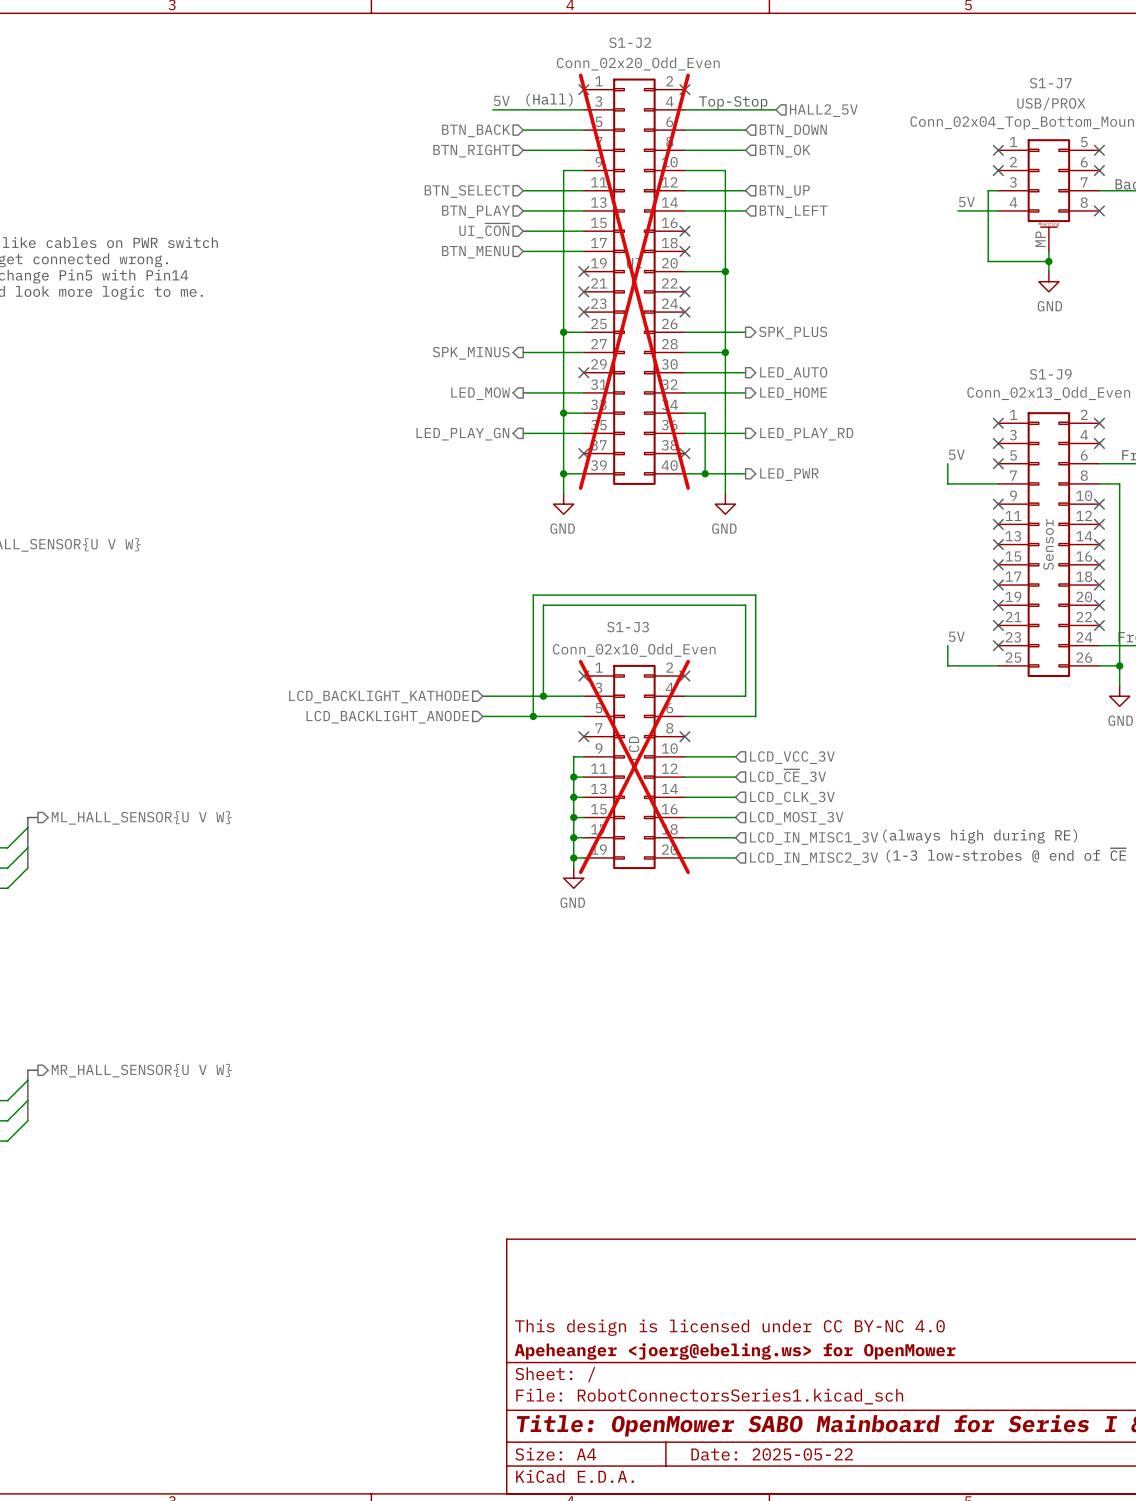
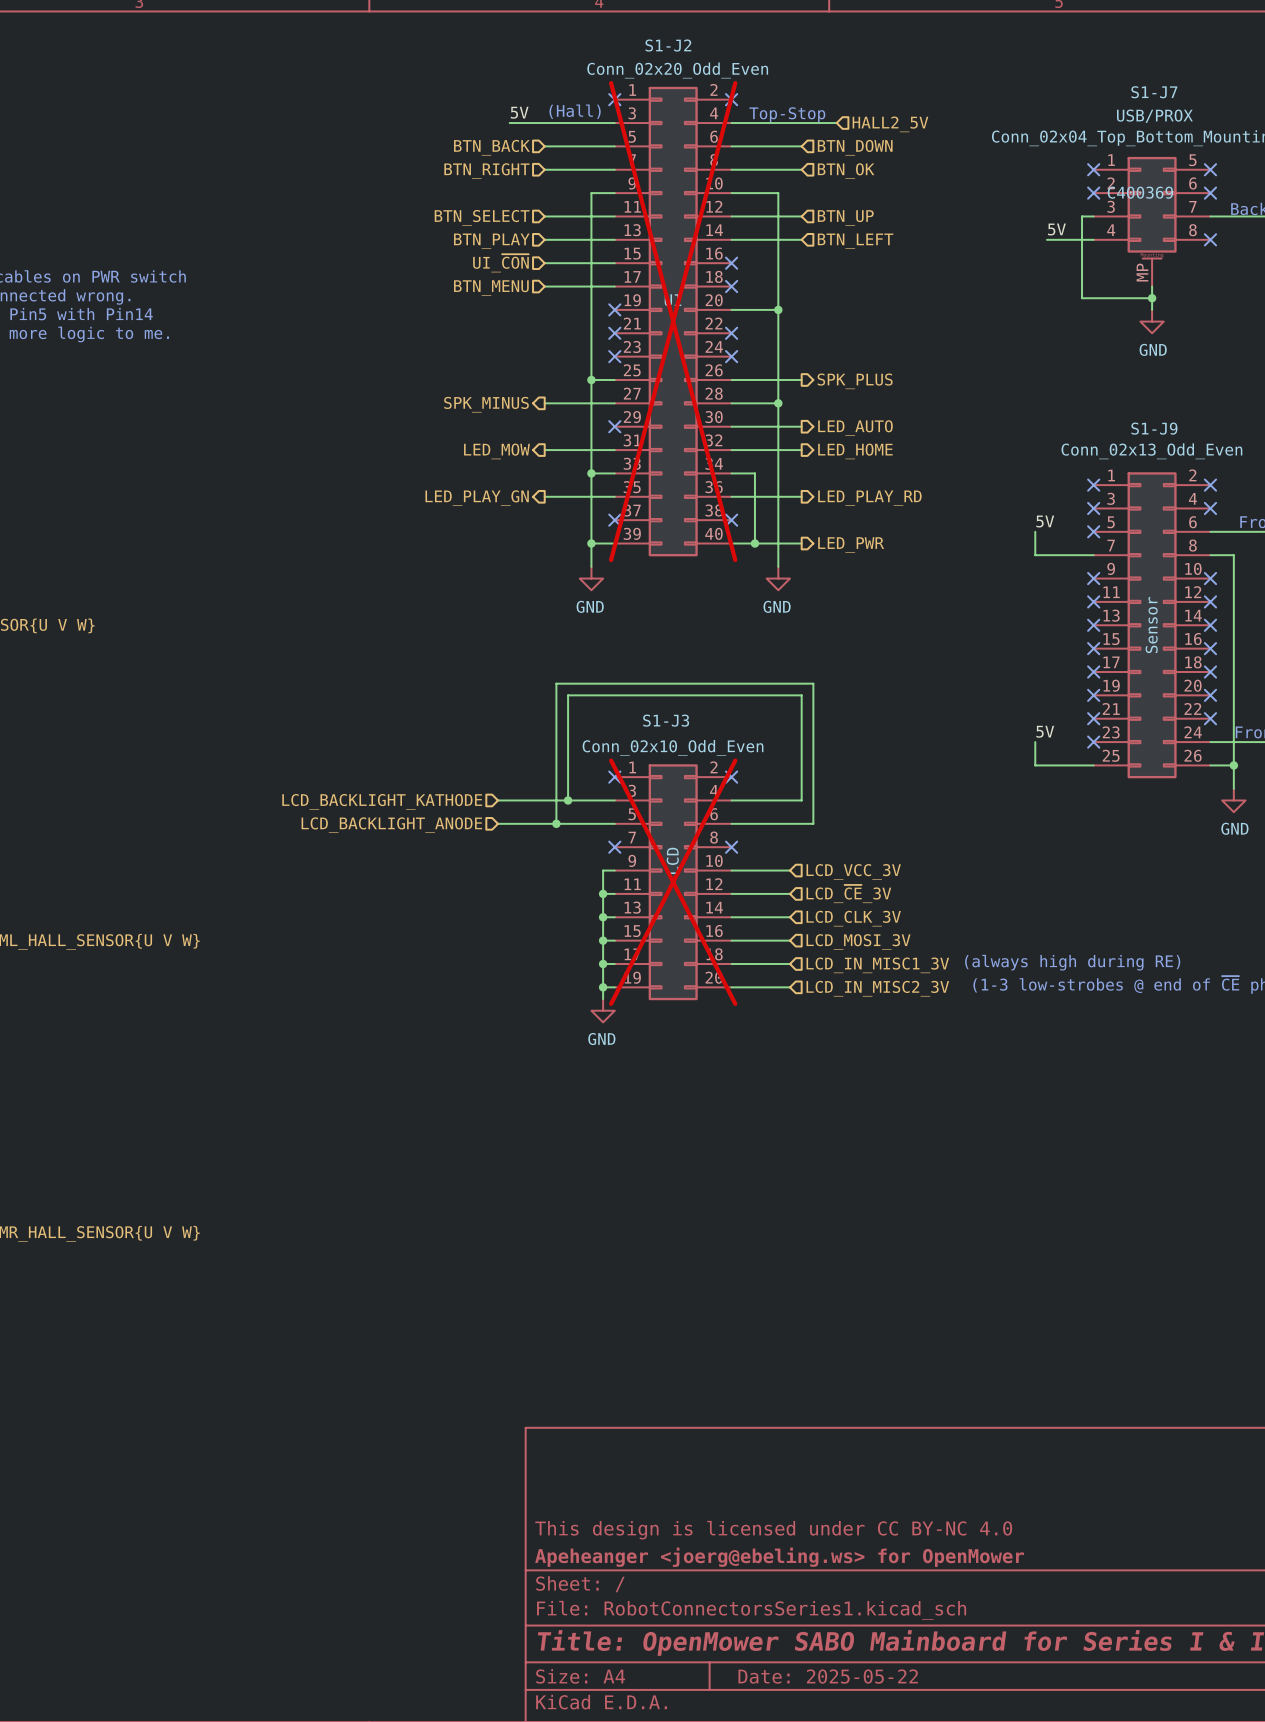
S1-J7 text: none -> C400369 (1140, 192)

